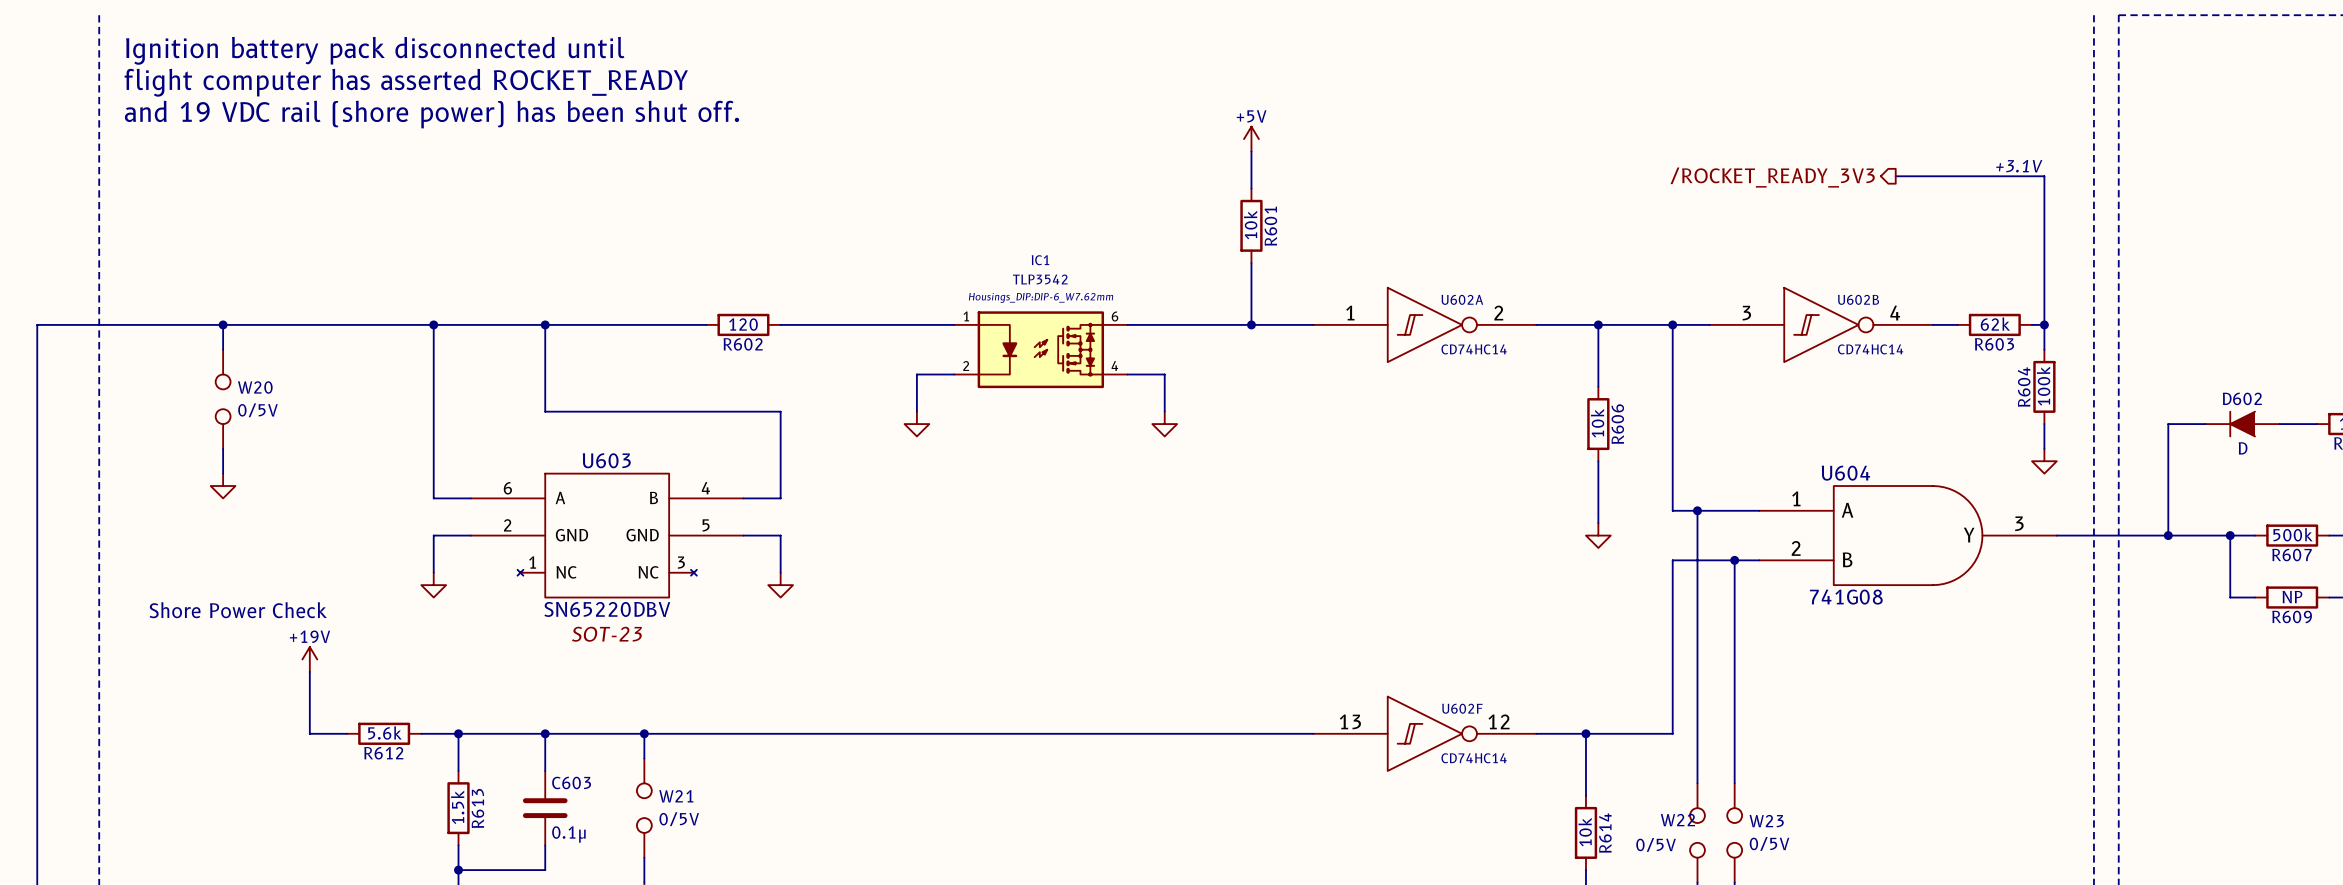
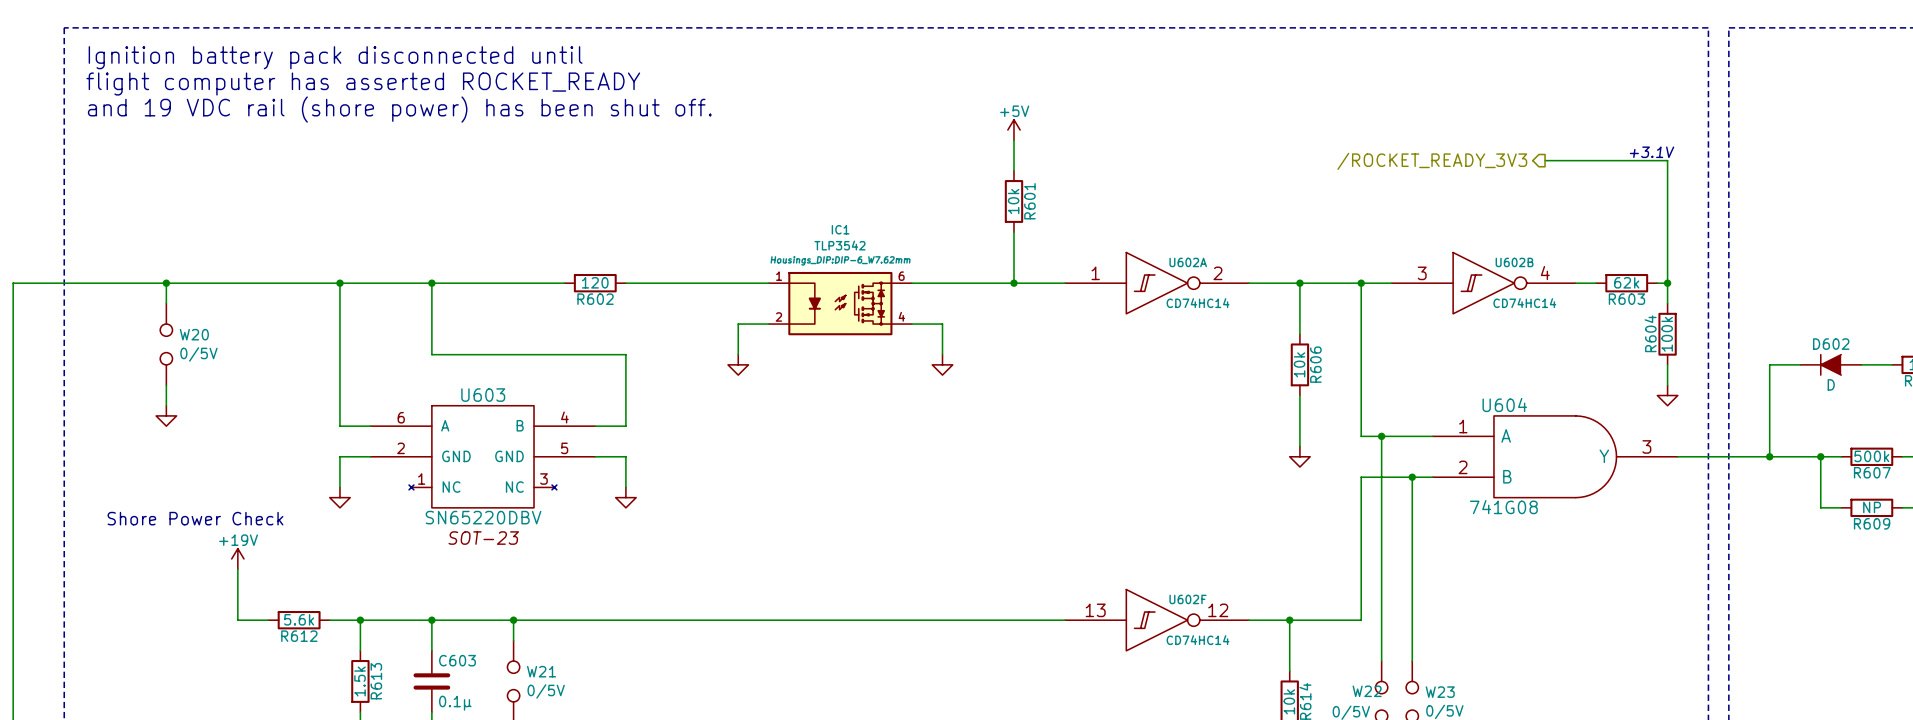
line: none -> (64, 27) (1708, 27)

